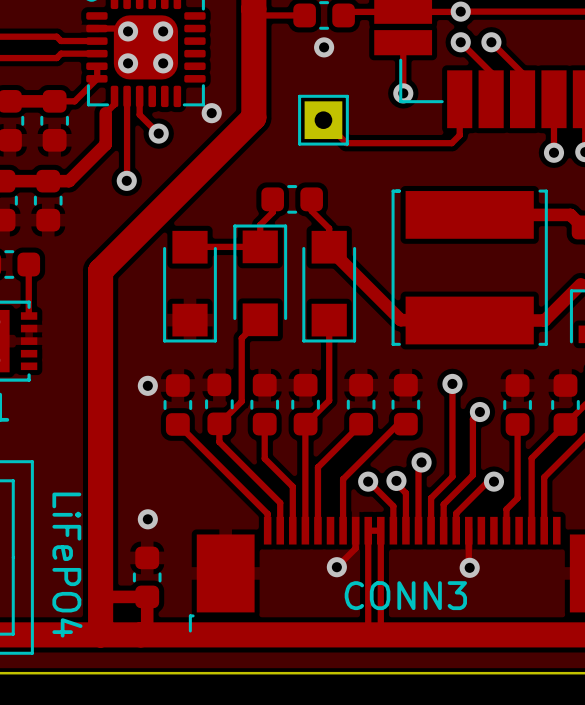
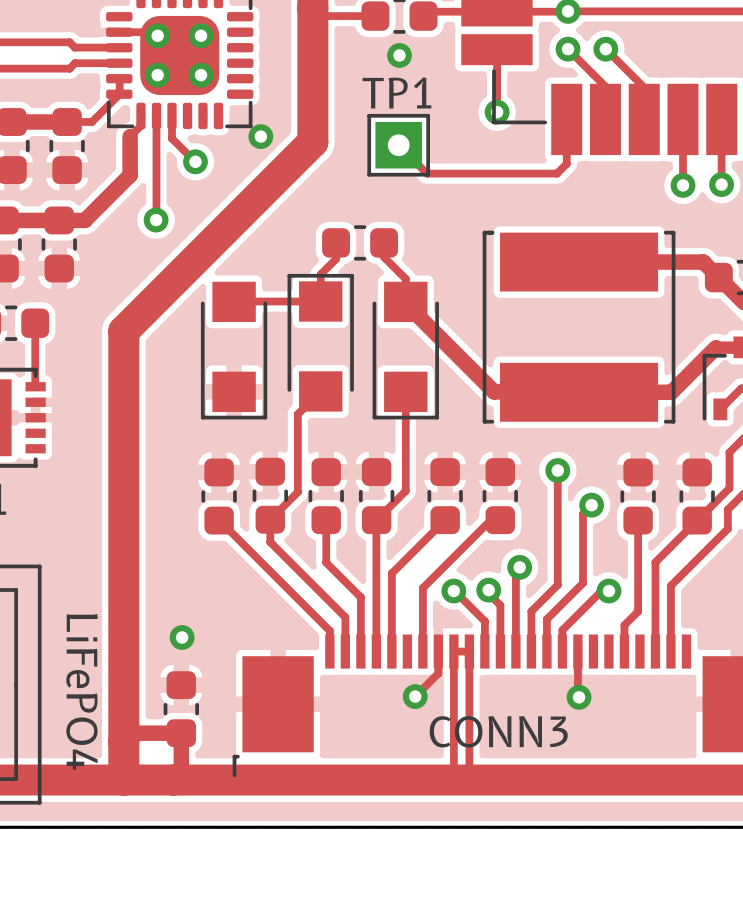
TP1 name: none -> TP1 (396, 92)
via: (147, 385) -> none

